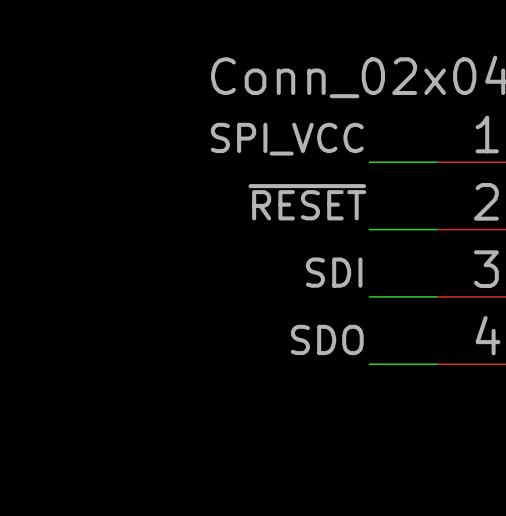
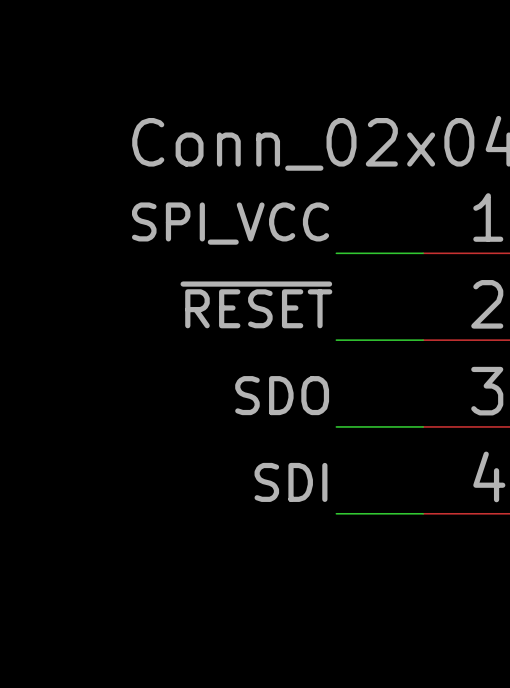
label: SDI (334, 272) -> SDO (282, 395)
label: SDO (327, 339) -> SDI (291, 482)

